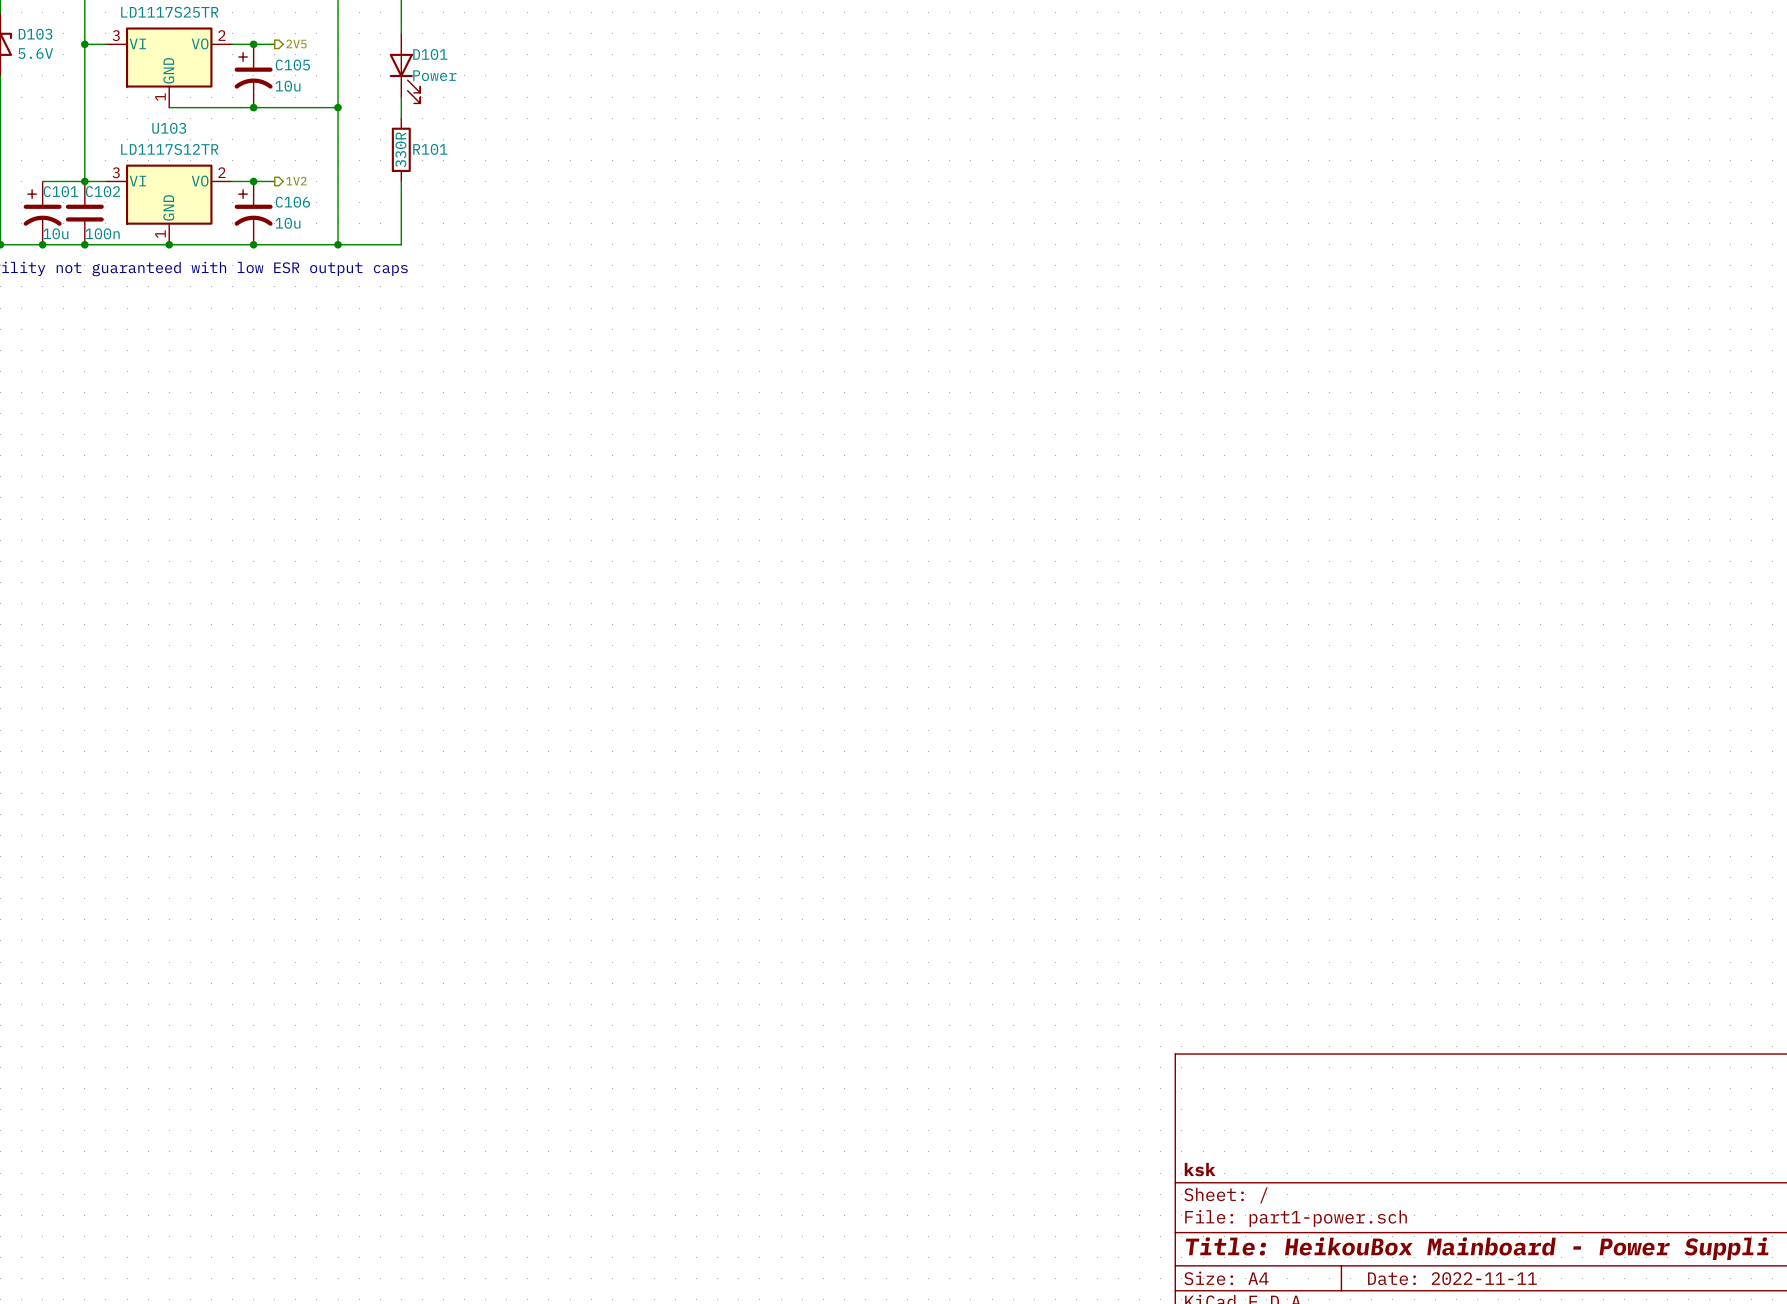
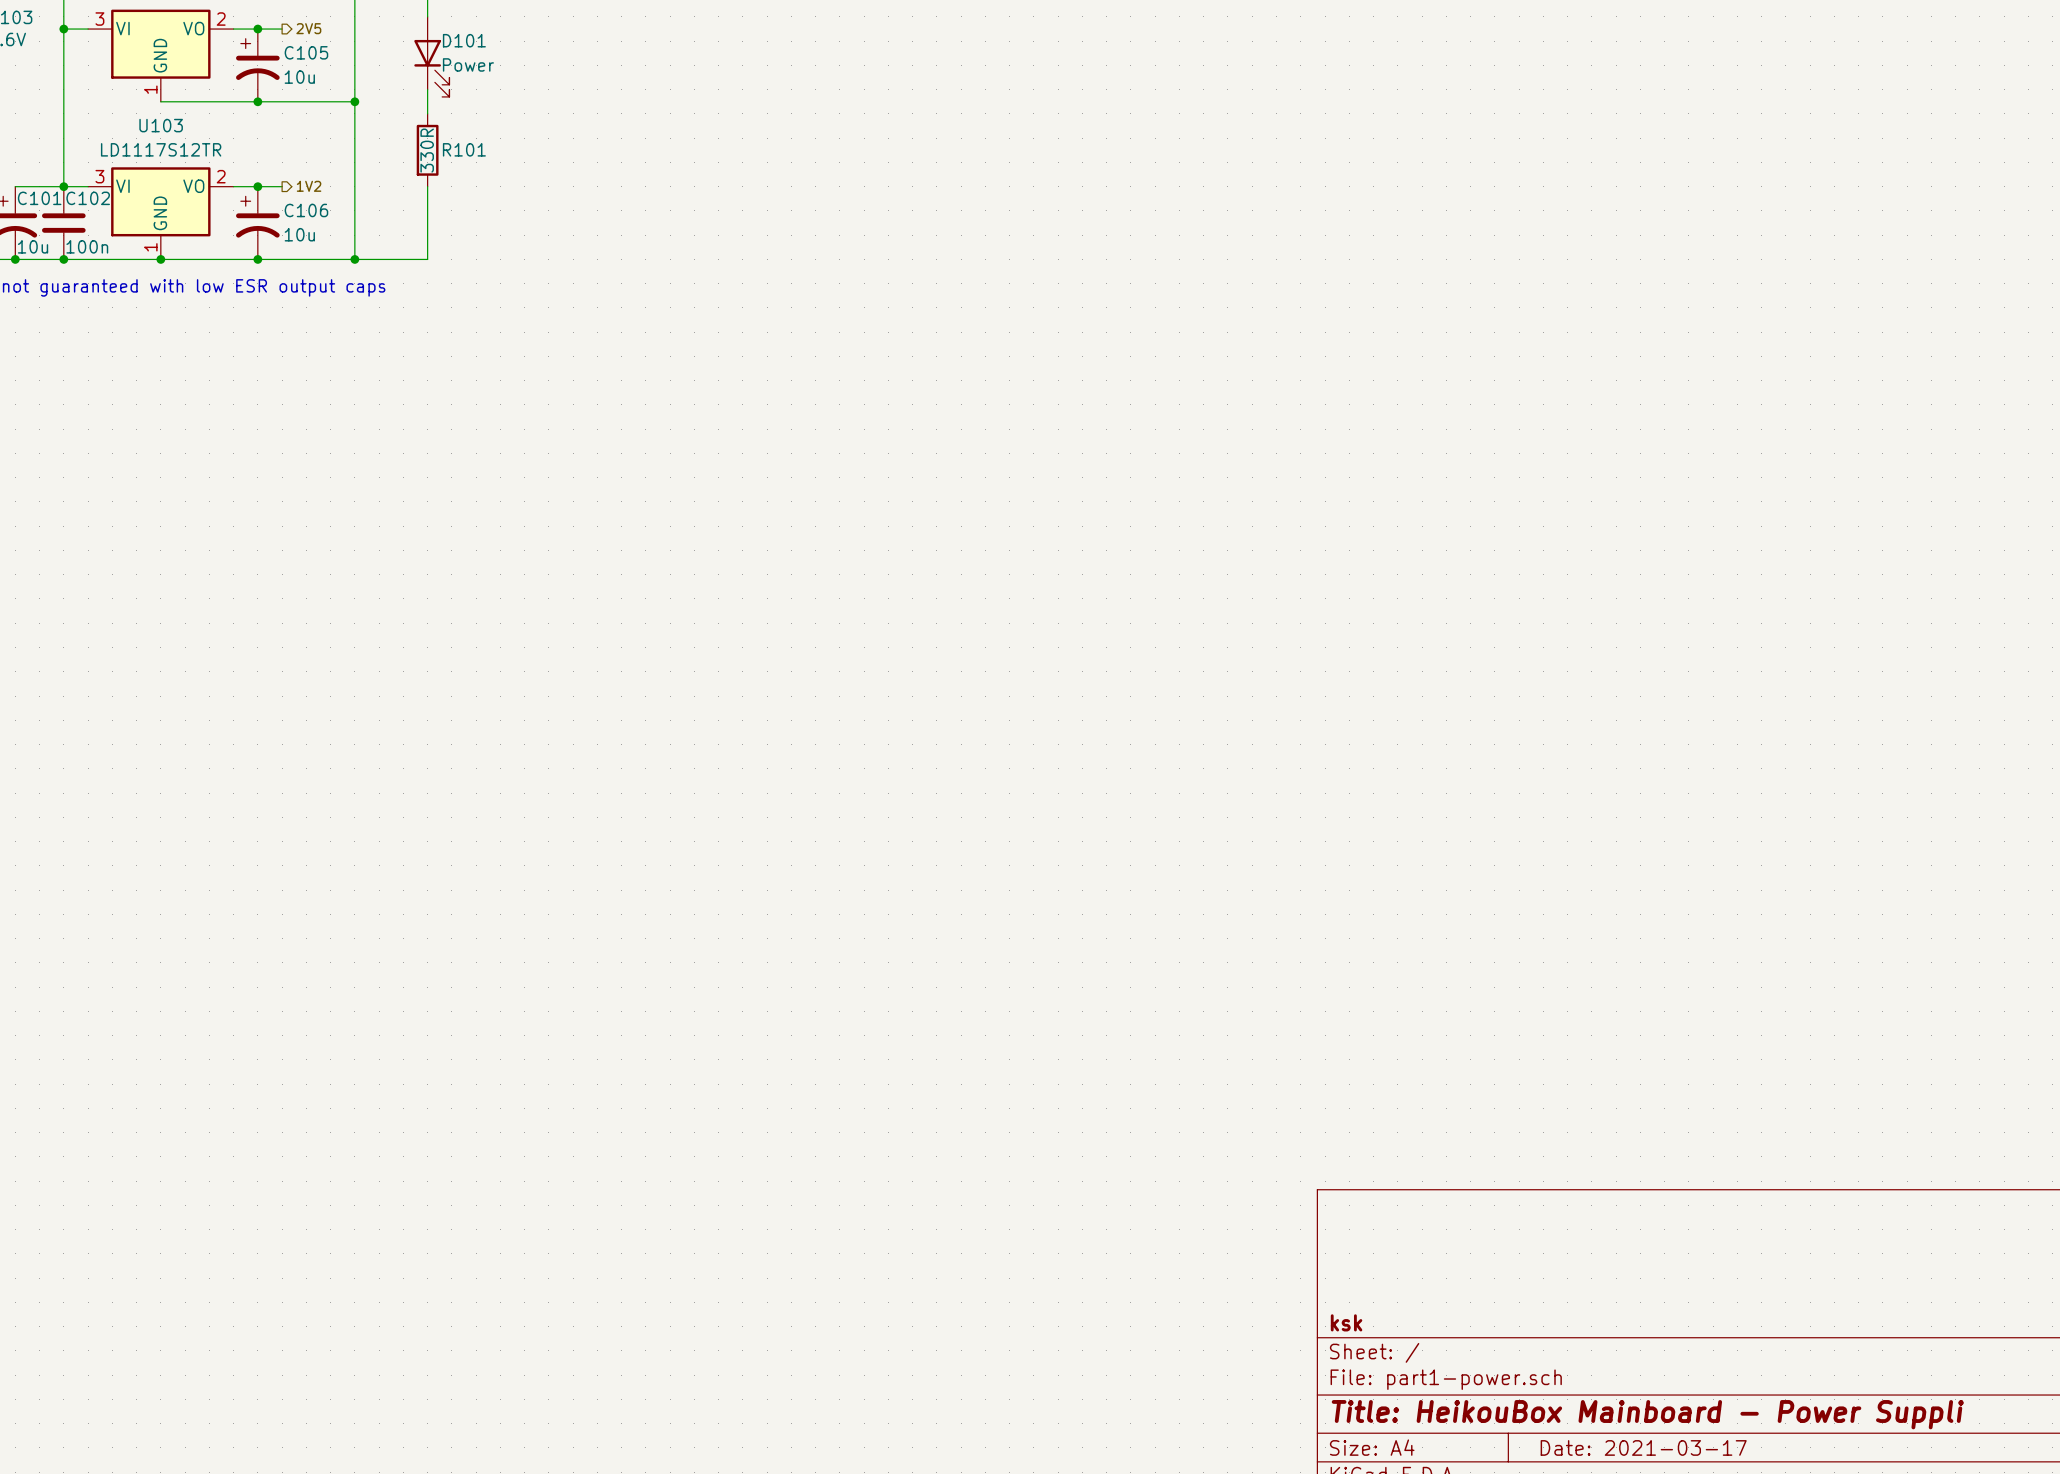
title block: Date: 2022-11-11 (1452, 1278) -> Date: 2021-03-17 (1643, 1447)

